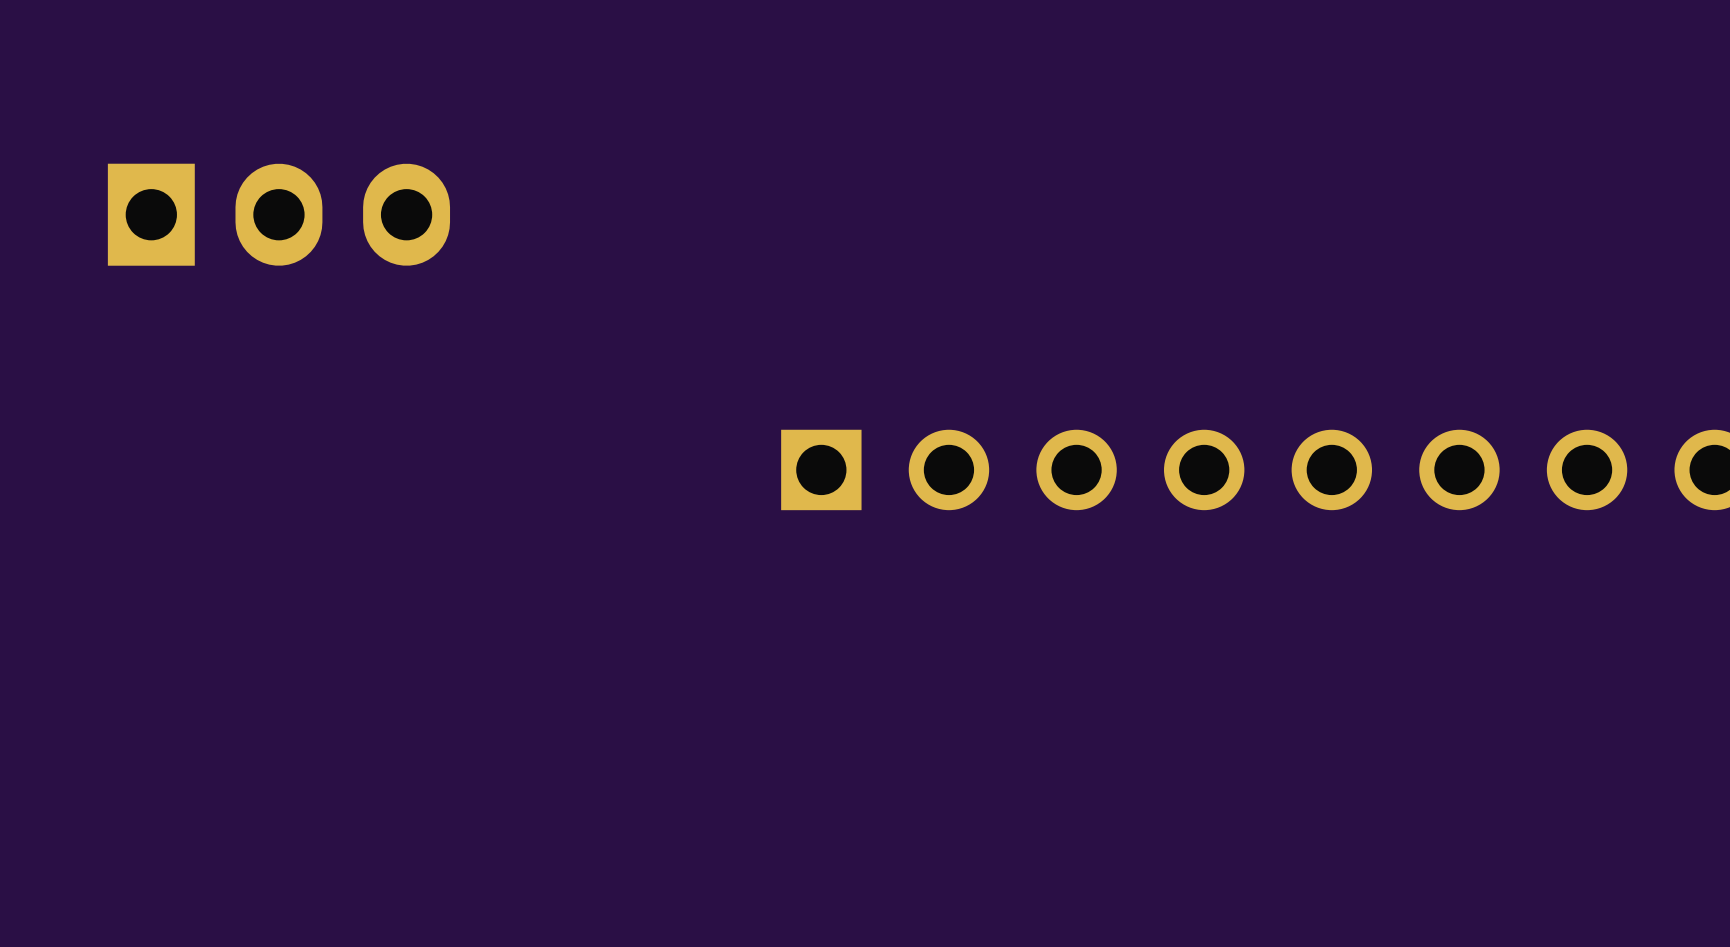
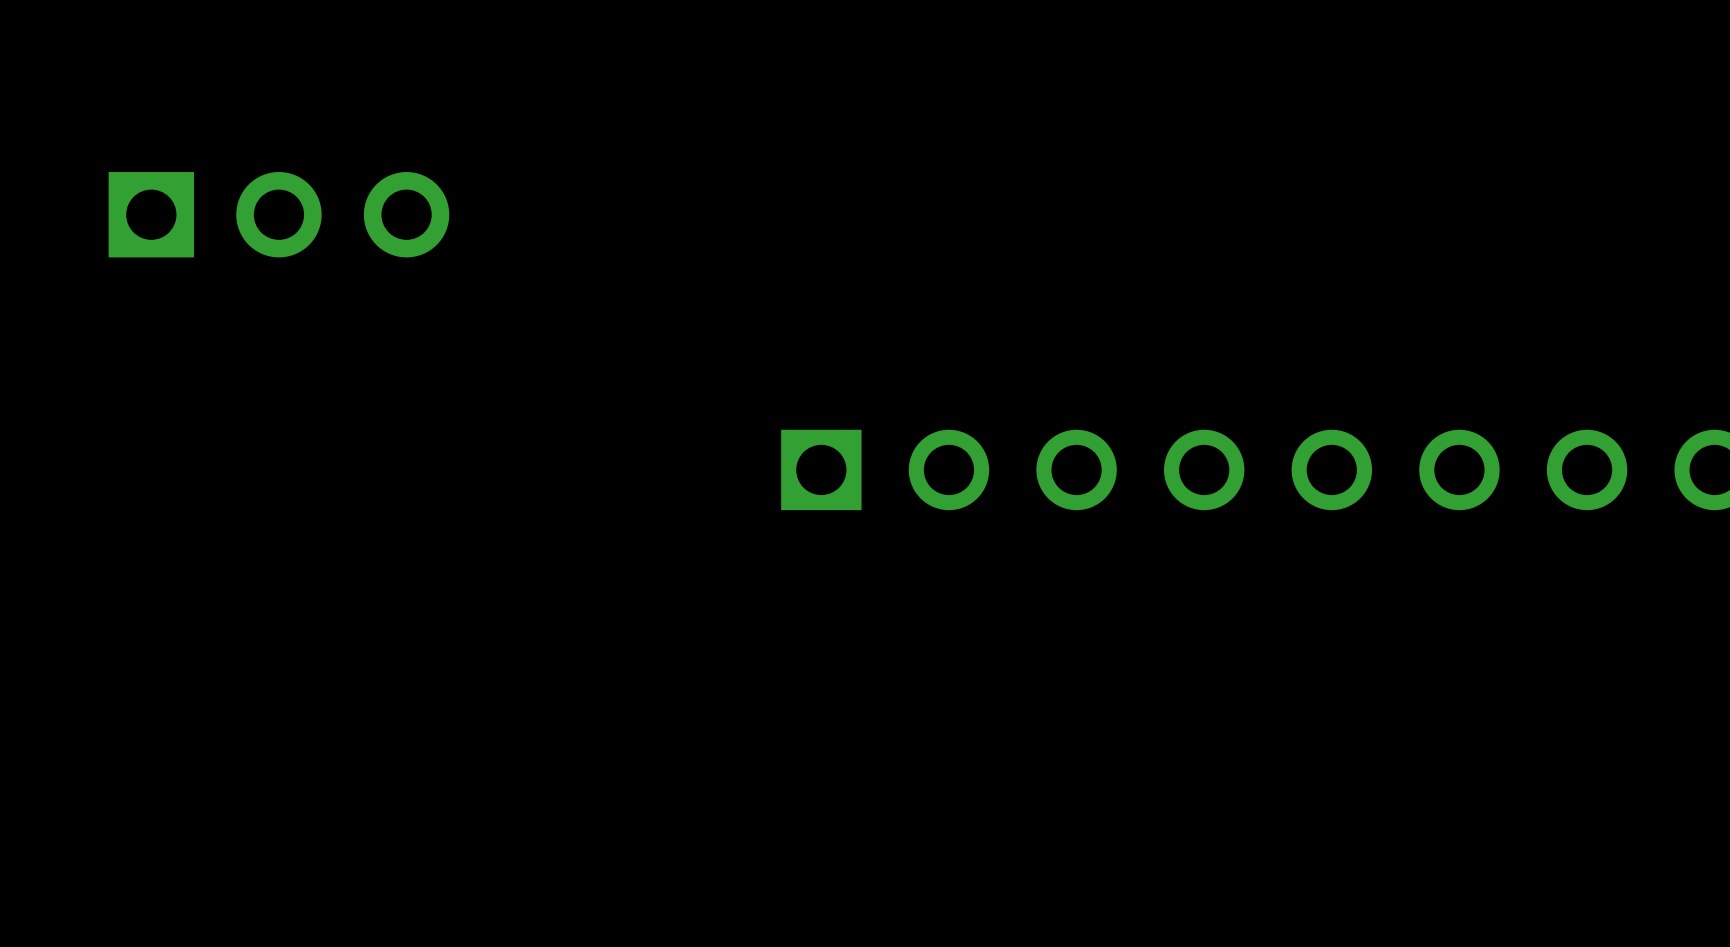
part footprint: [107, 163, 451, 266] -> [108, 172, 450, 258]

